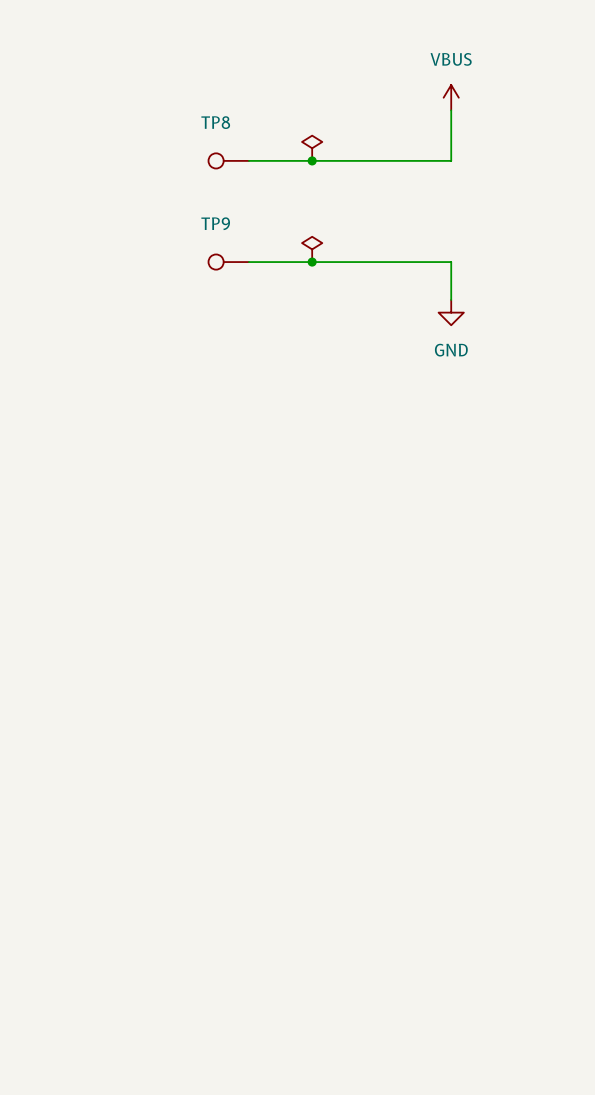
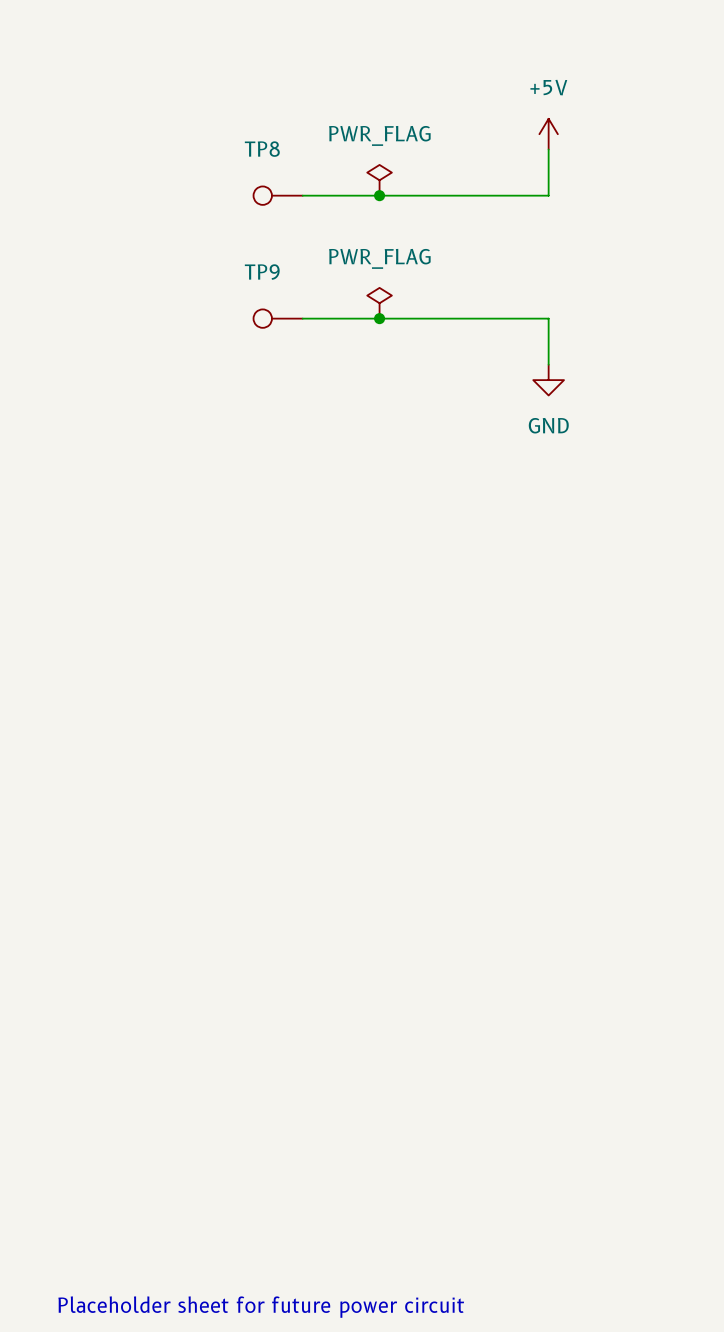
power symbol: VBUS (451, 97) -> none
power symbol: none -> +5V (548, 134)
power symbol text: none -> PWR_FLAG (379, 135)
power symbol text: none -> PWR_FLAG (379, 258)
text: none -> Placeholder sheet for future power circuit (261, 1307)

